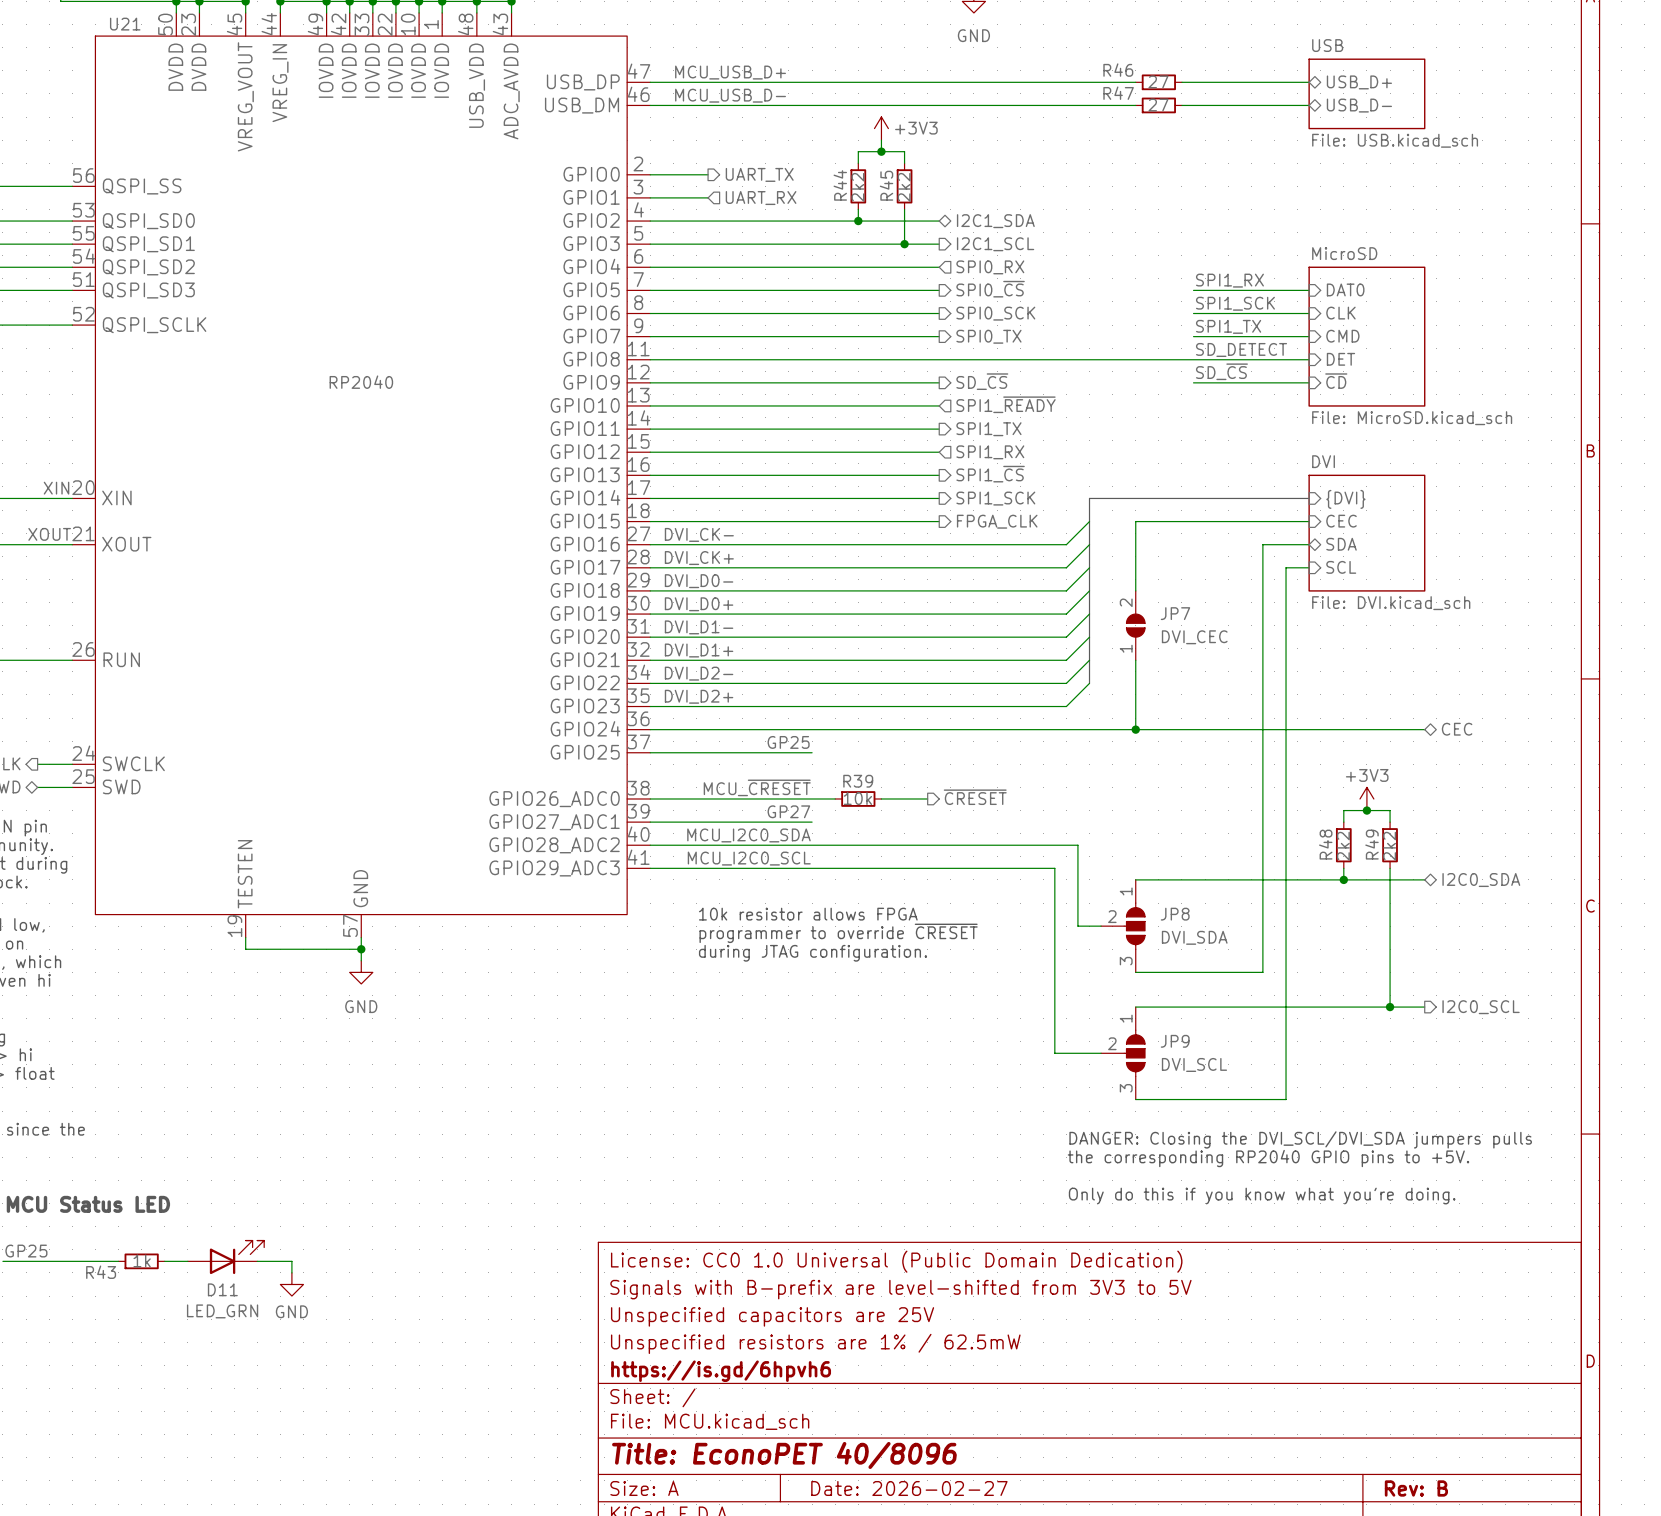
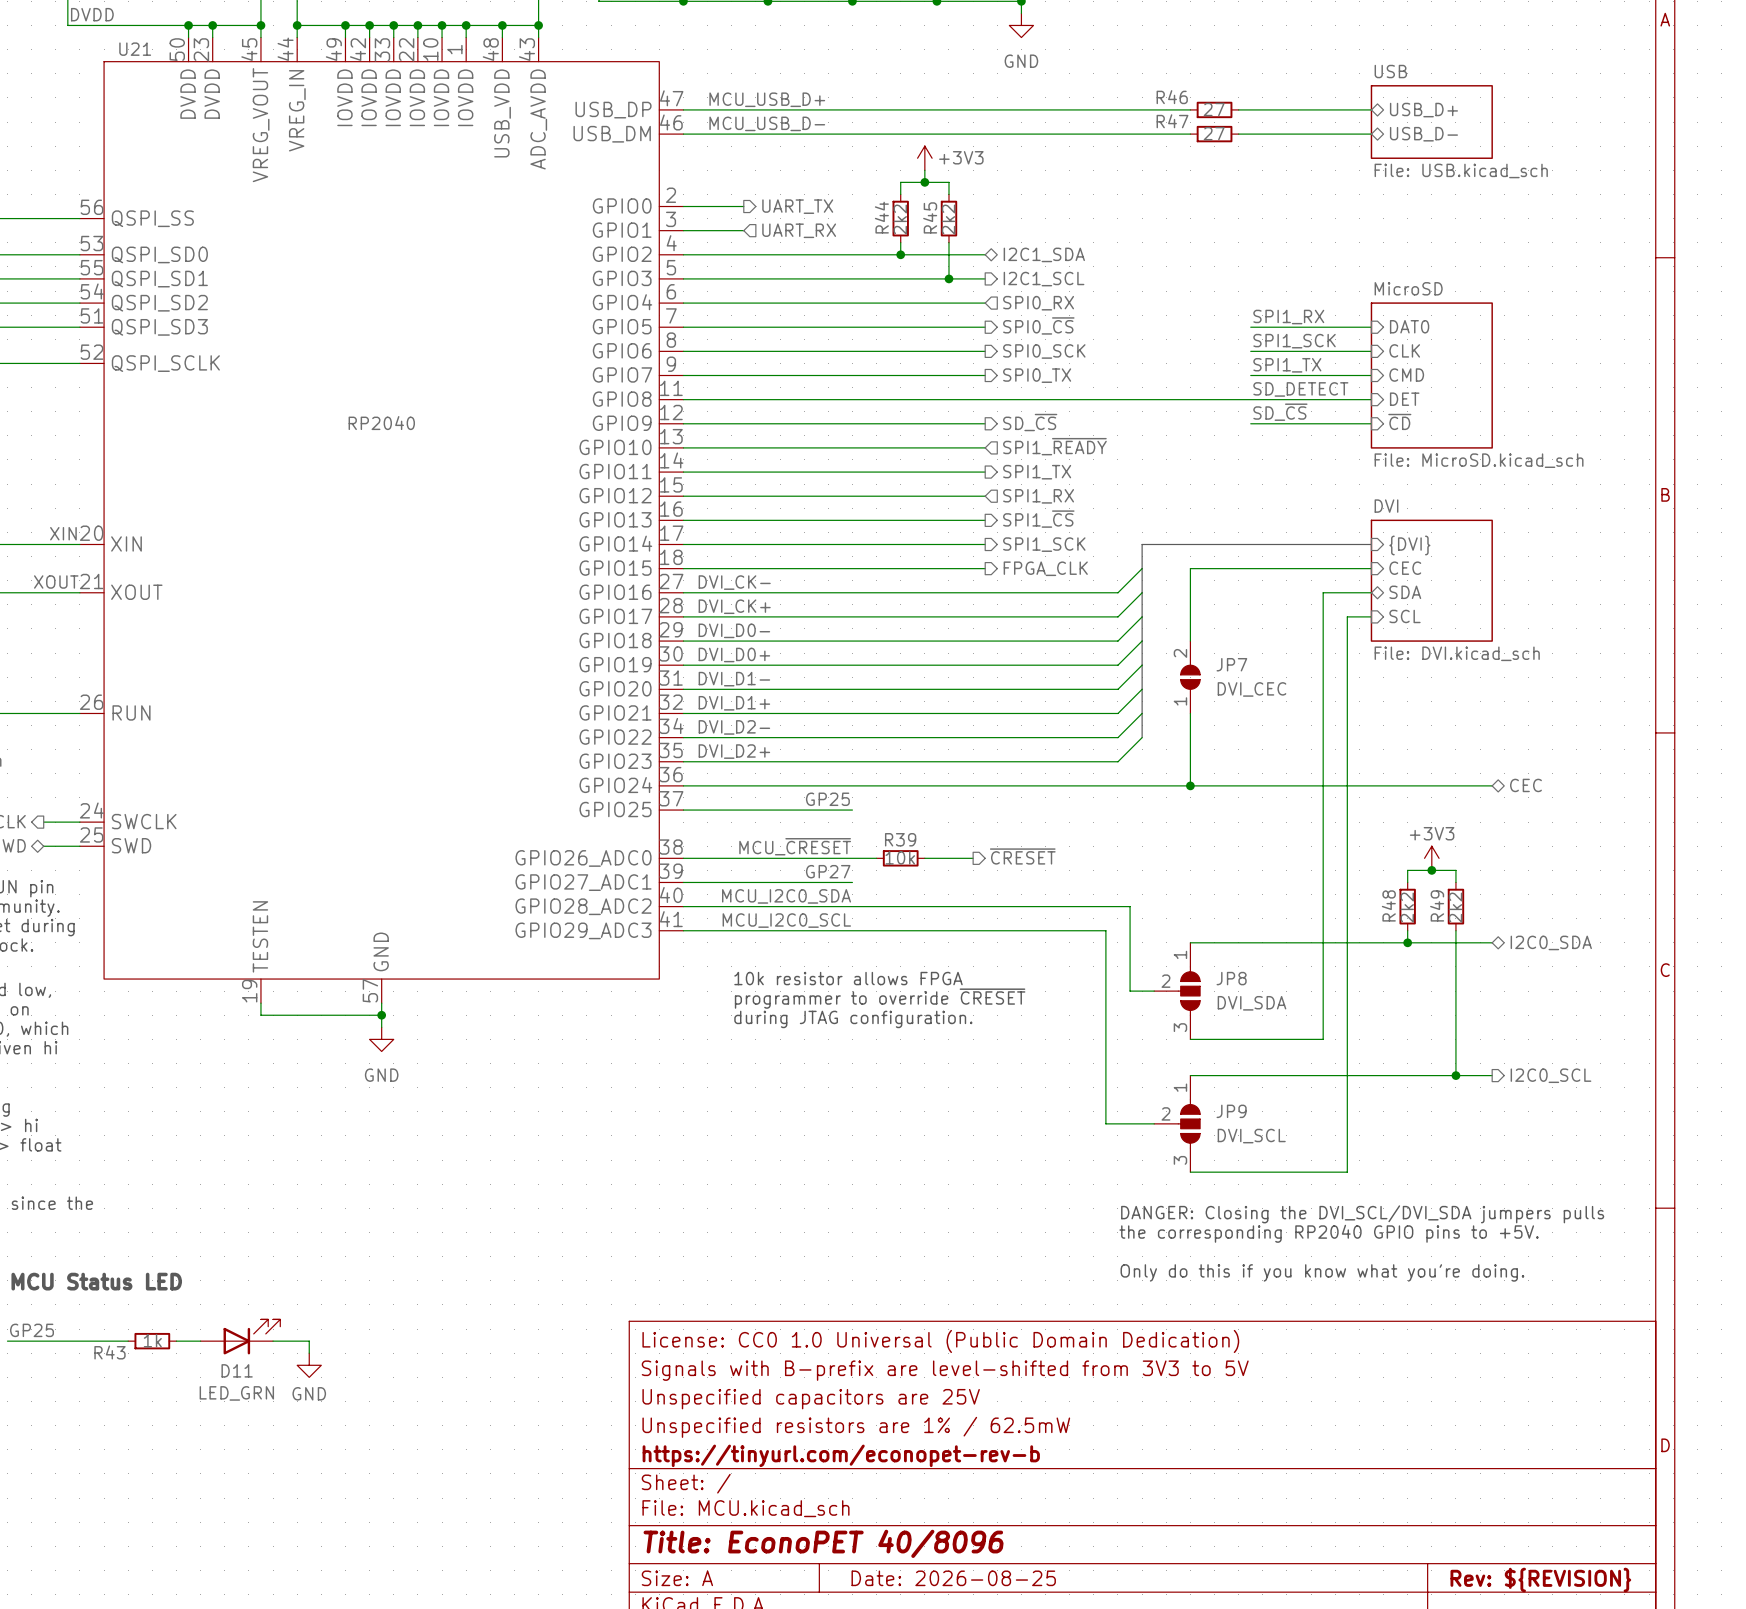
title block: https://is.gd/6hpvh6 (721, 1371) -> https://tinyurl.com/econopet-rev-b (841, 1455)
title block: Date: 2026-02-27 (909, 1488) -> Date: 2026-08-25 (953, 1578)
title block: Rev: B (1416, 1488) -> Rev: ${REVISION} (1540, 1580)

